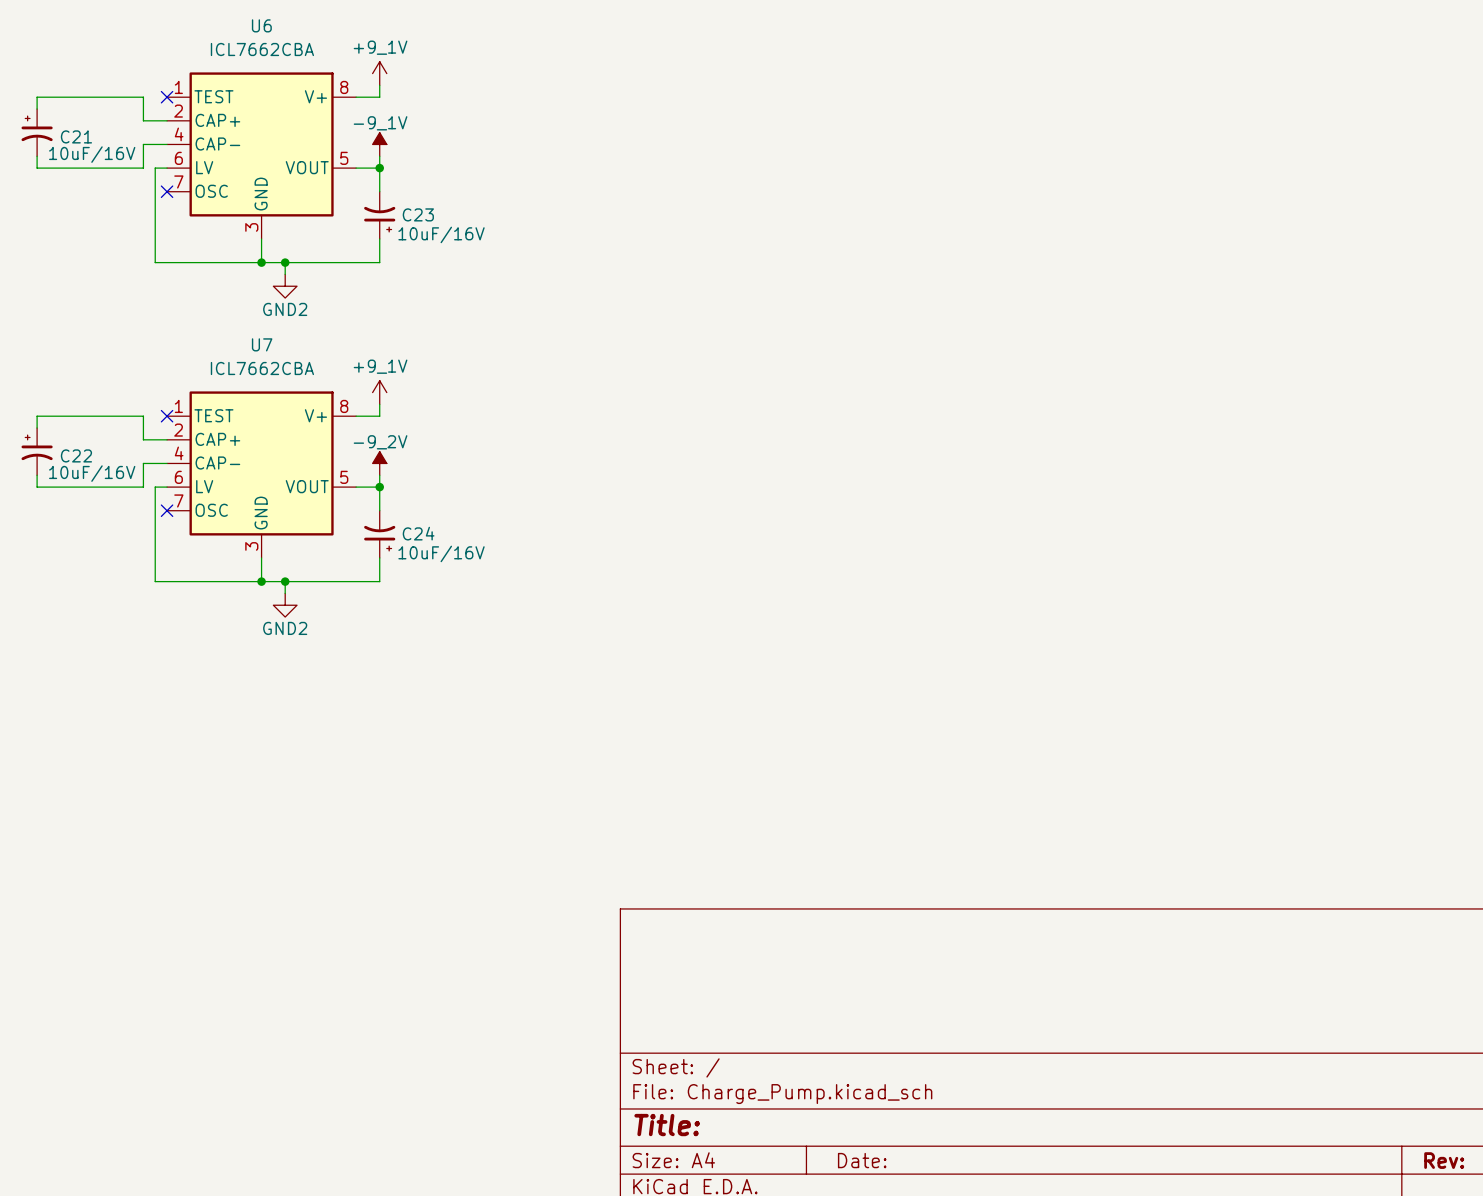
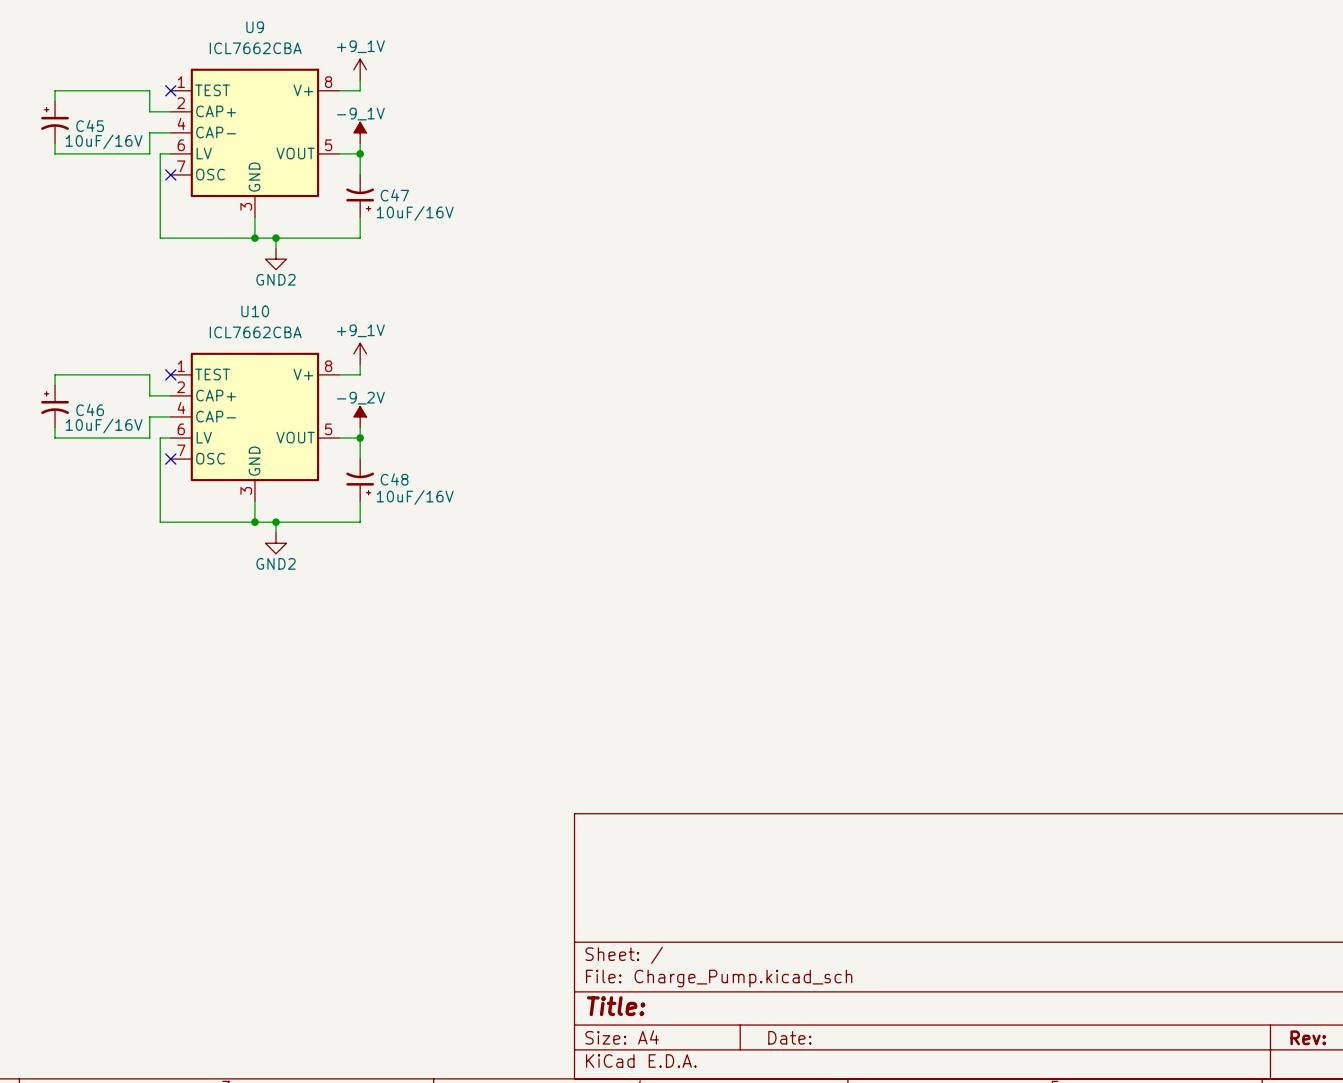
U6 name: U6 (261, 25) -> U9 (255, 27)
C21 name: C21 (76, 136) -> C45 (90, 125)
C23 name: C23 (418, 214) -> C47 (394, 195)
U7 name: U7 (262, 344) -> U10 (255, 311)
C22 name: C22 (76, 455) -> C46 (90, 410)
C24 name: C24 (418, 533) -> C48 (394, 479)

